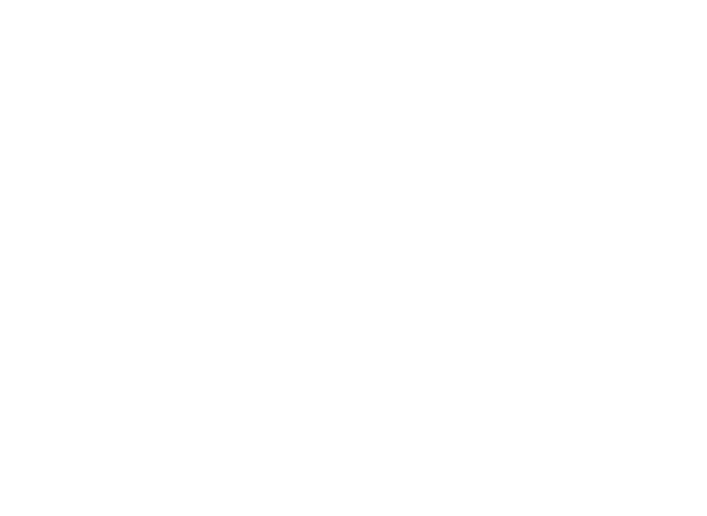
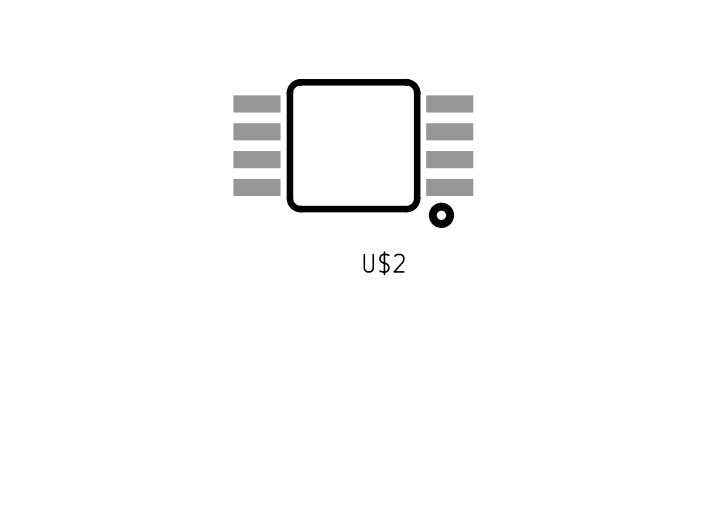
U$2: none -> (353, 153)

